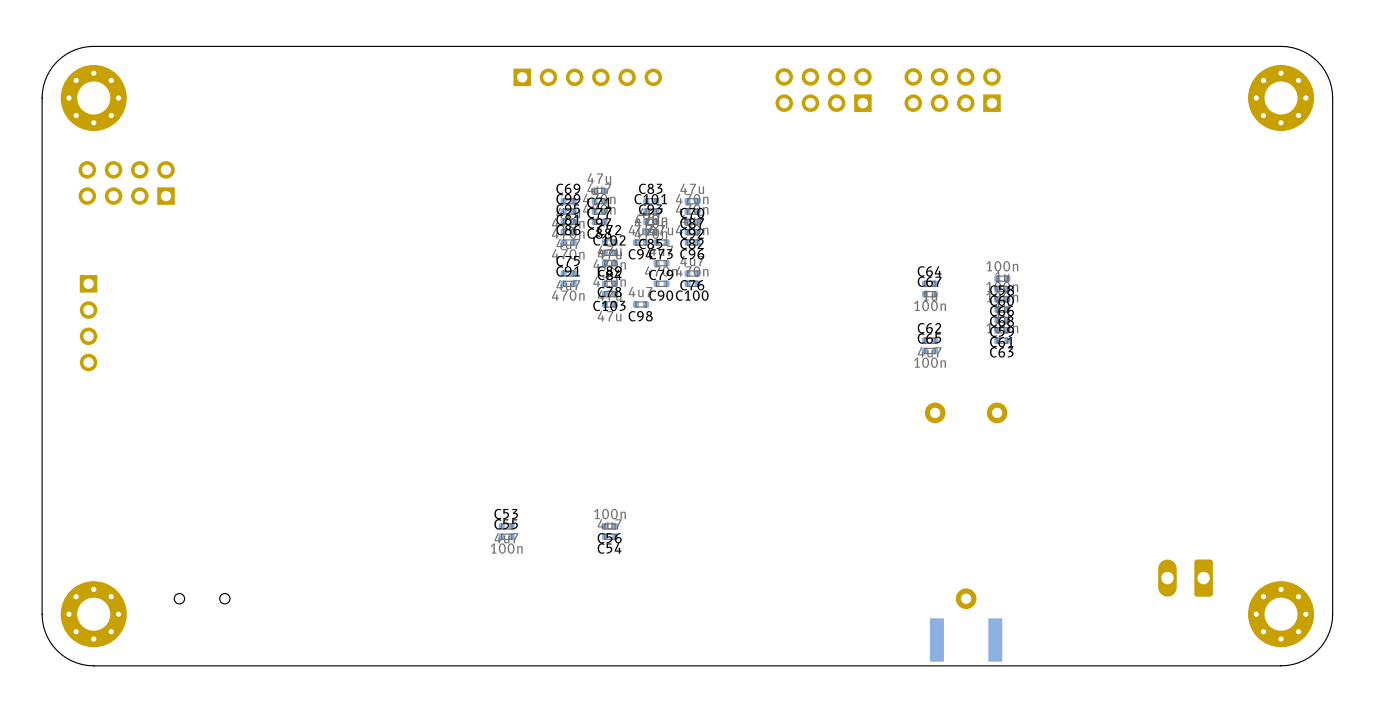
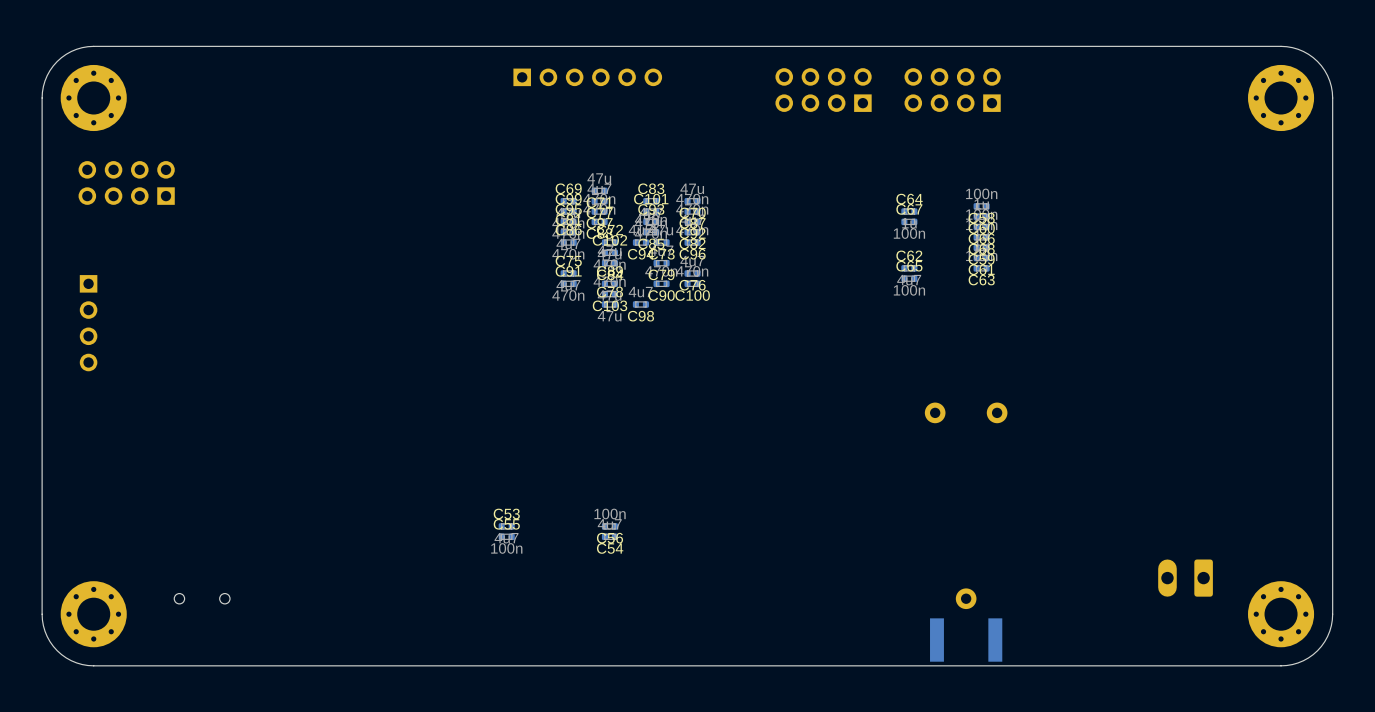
C58 position: (1002, 278) -> (981, 206)
C64 position: (930, 283) -> (909, 211)
C60 position: (1002, 289) -> (981, 216)
C67 position: (930, 294) -> (909, 221)
C66 position: (1002, 299) -> (981, 227)
C68 position: (1002, 309) -> (981, 237)
C59 position: (1002, 319) -> (981, 247)
C61 position: (1002, 330) -> (981, 258)
C62 position: (930, 340) -> (909, 268)
C63 position: (1002, 340) -> (981, 268)
C65 position: (930, 350) -> (909, 278)

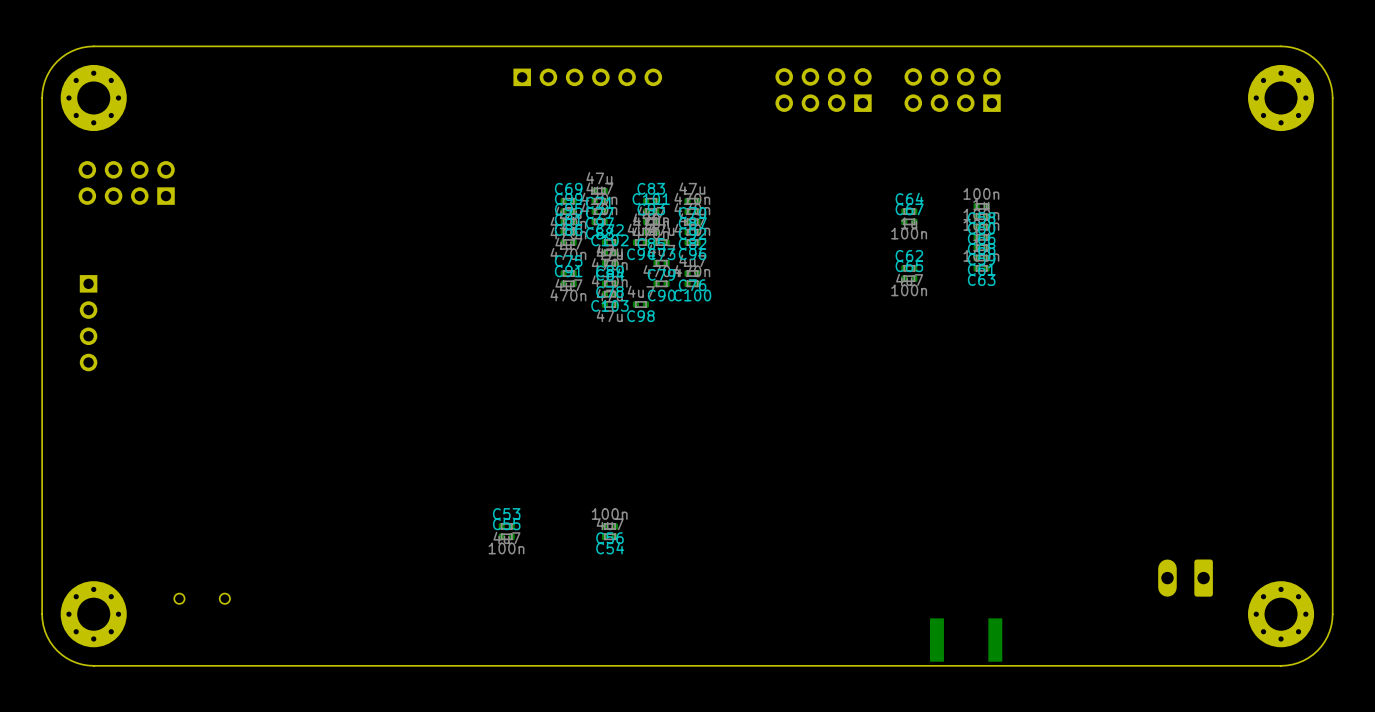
part: (935, 412) -> none
part: (997, 412) -> none
part: (966, 598) -> none

